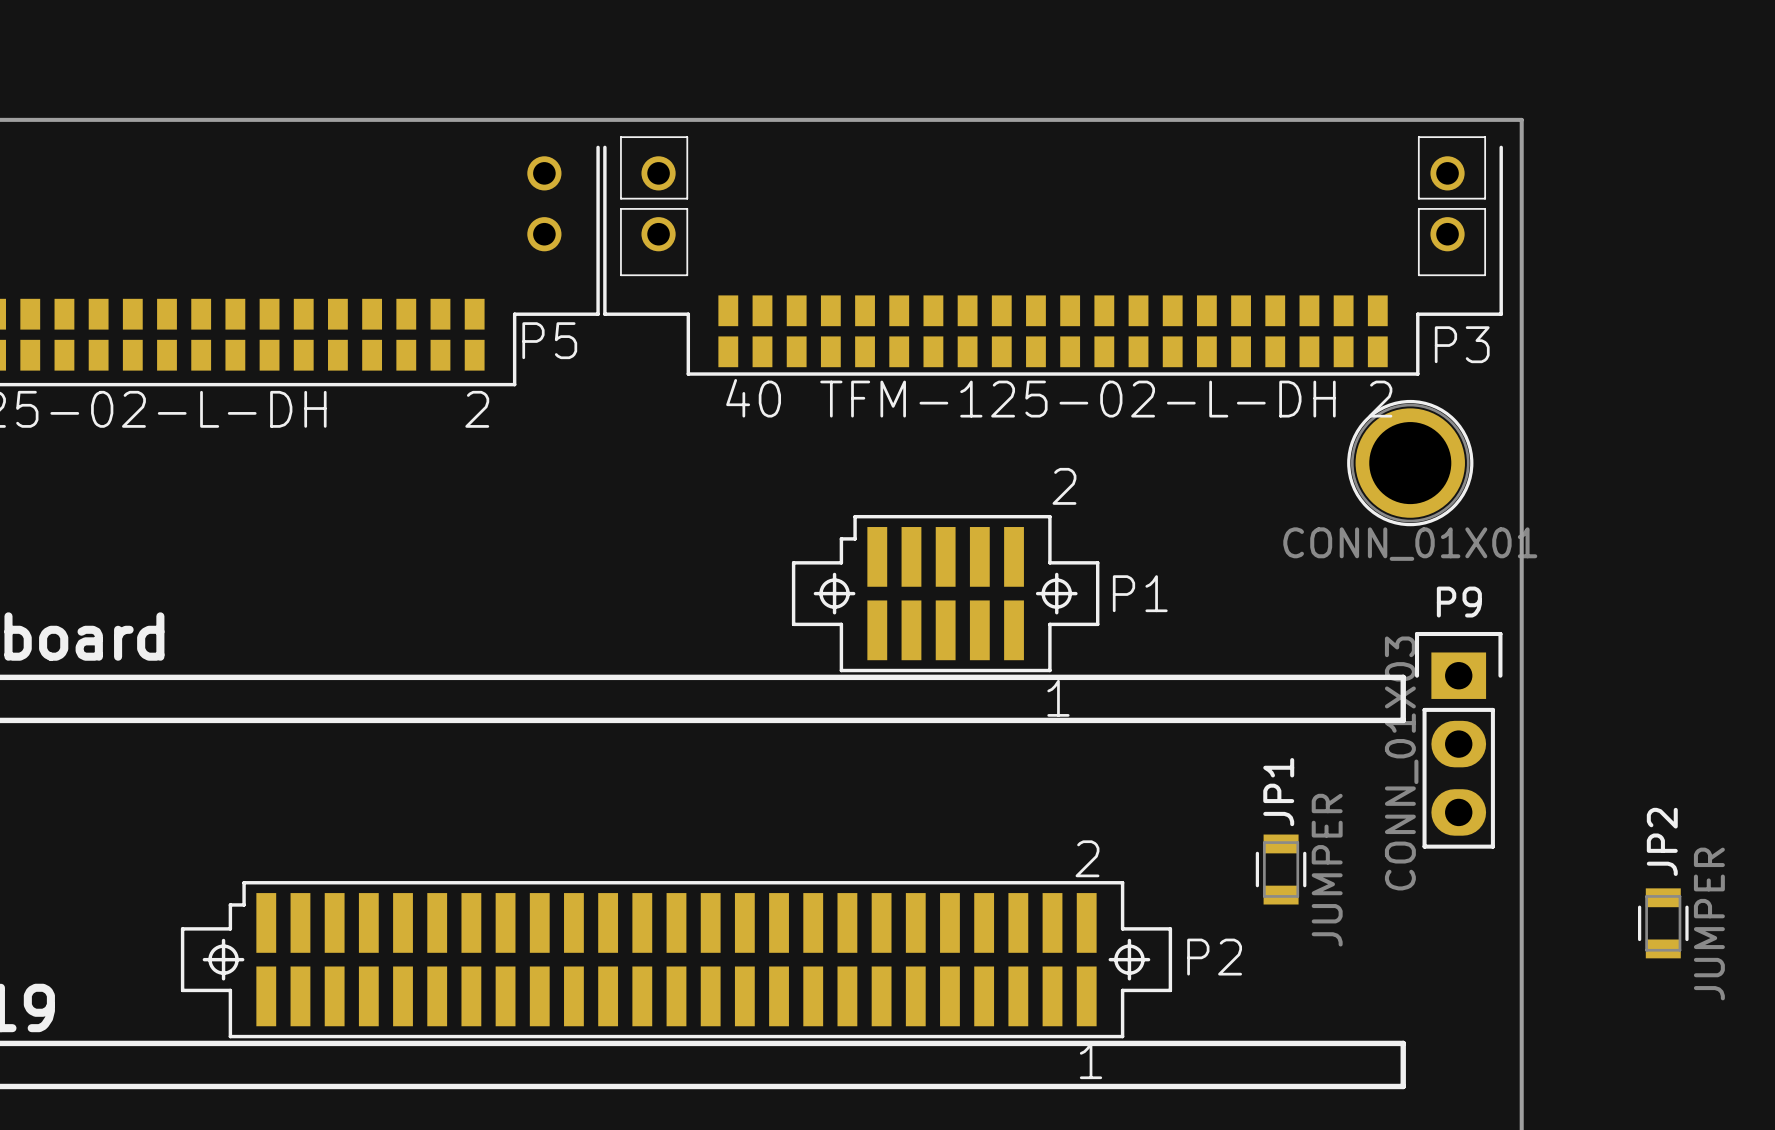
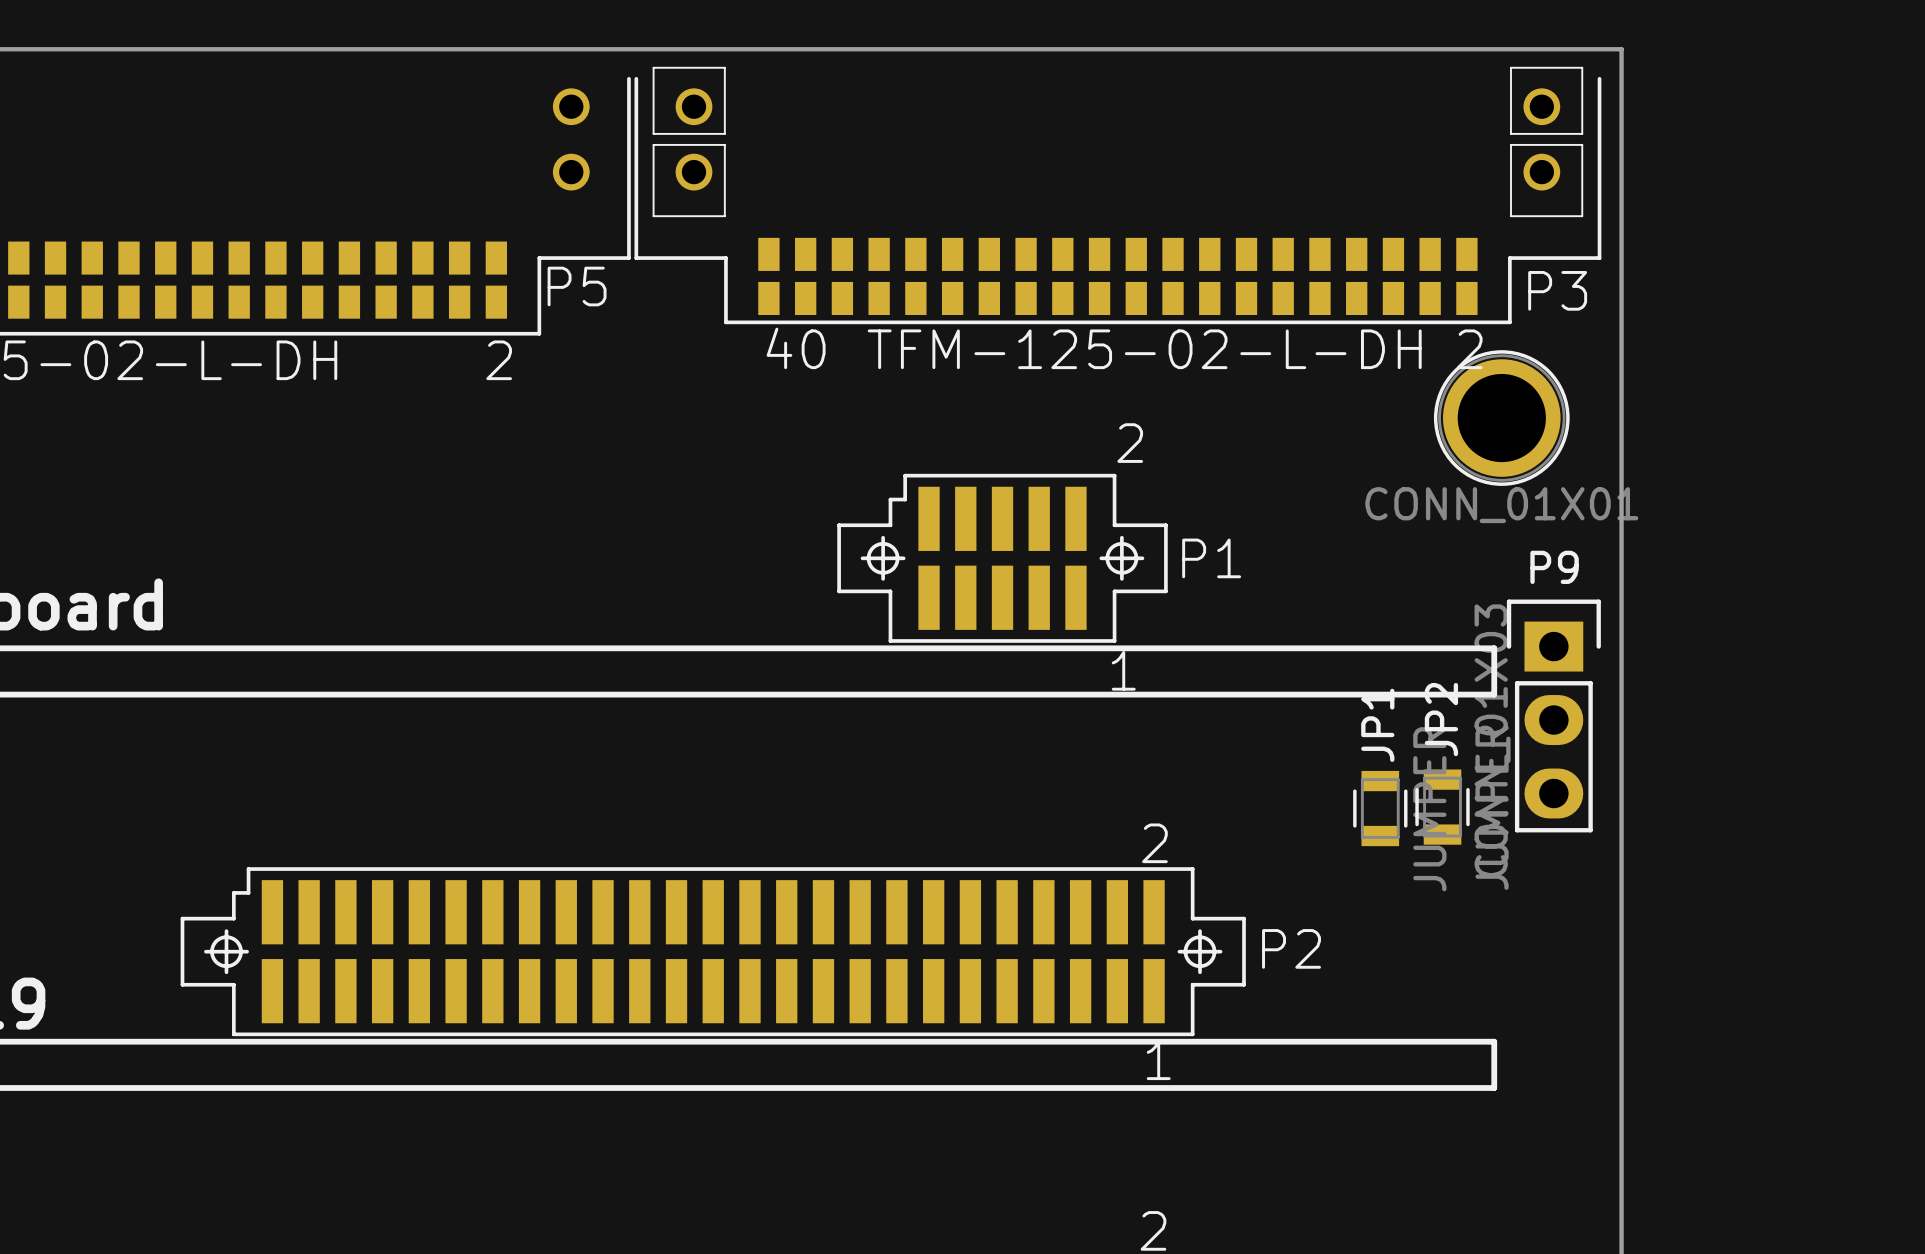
JP1 position: (1281, 869) -> (1380, 808)
JP2 position: (1663, 923) -> (1442, 807)

